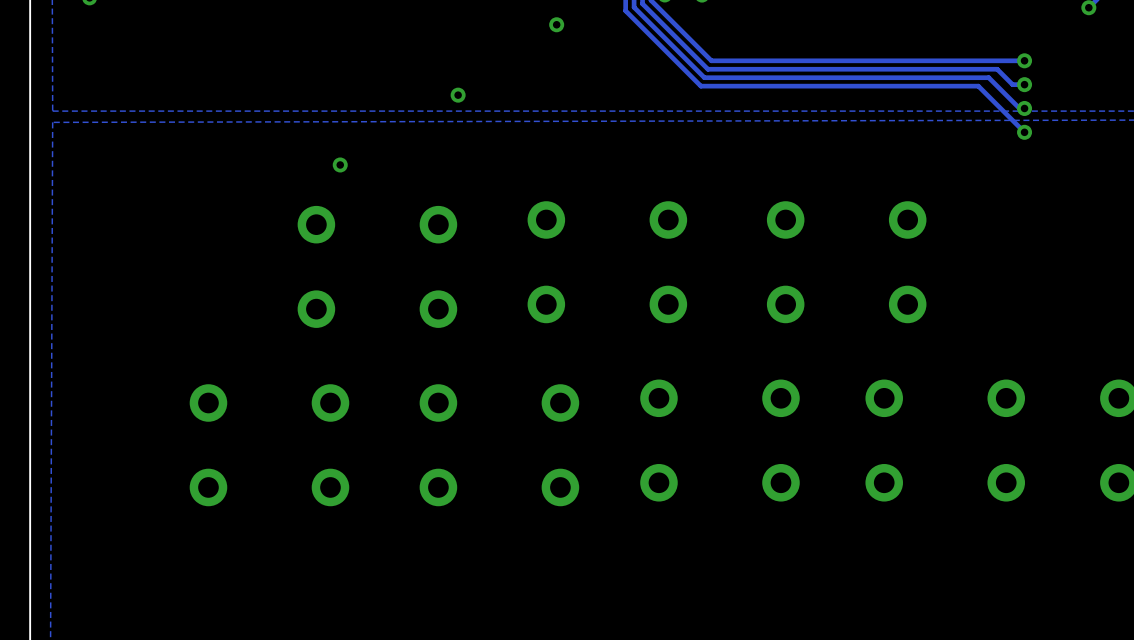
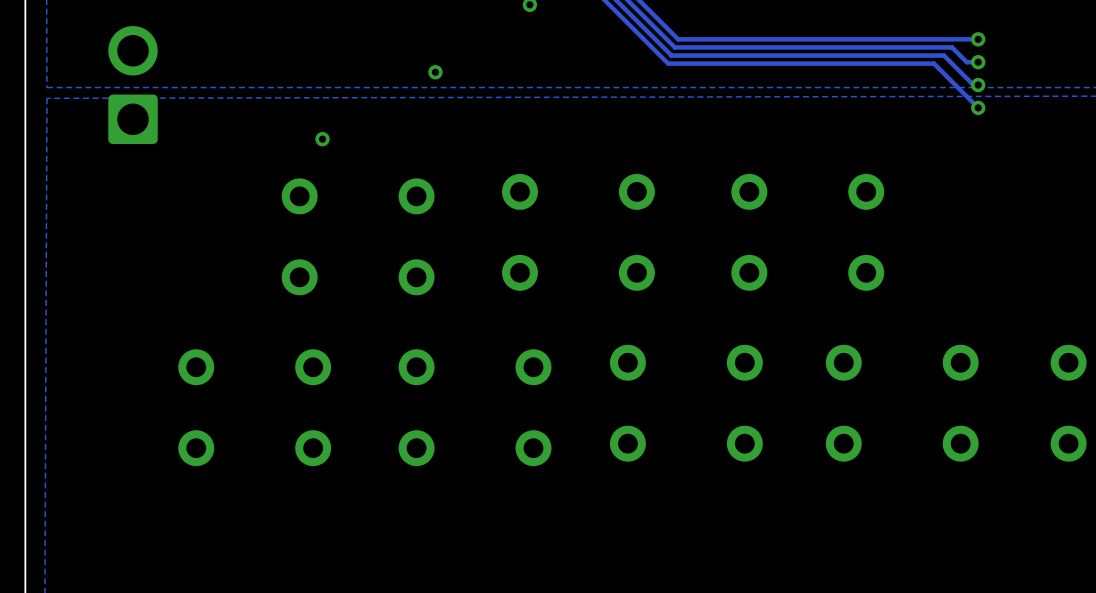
part: none -> (133, 50)
part: none -> (133, 119)

